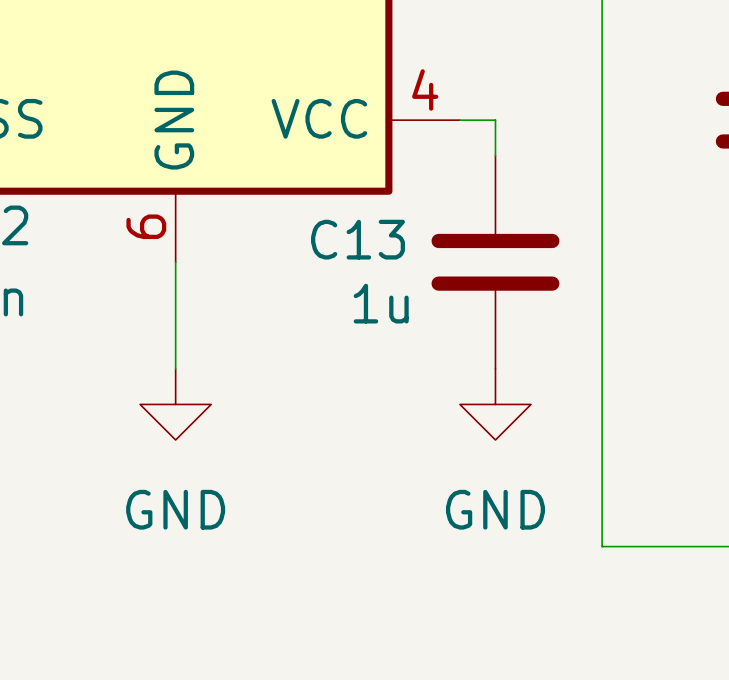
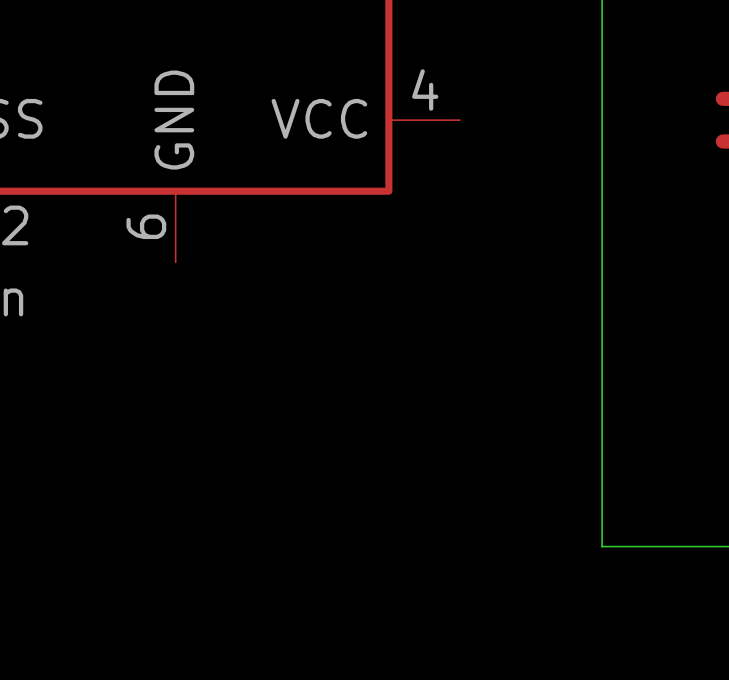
wire: (459, 120) (495, 120) (495, 155) -> none
wire: (175, 262) (175, 368) -> none
C13: 1u (495, 262) -> none
power symbol: GND (175, 404) -> none
power symbol: GND (495, 404) -> none

